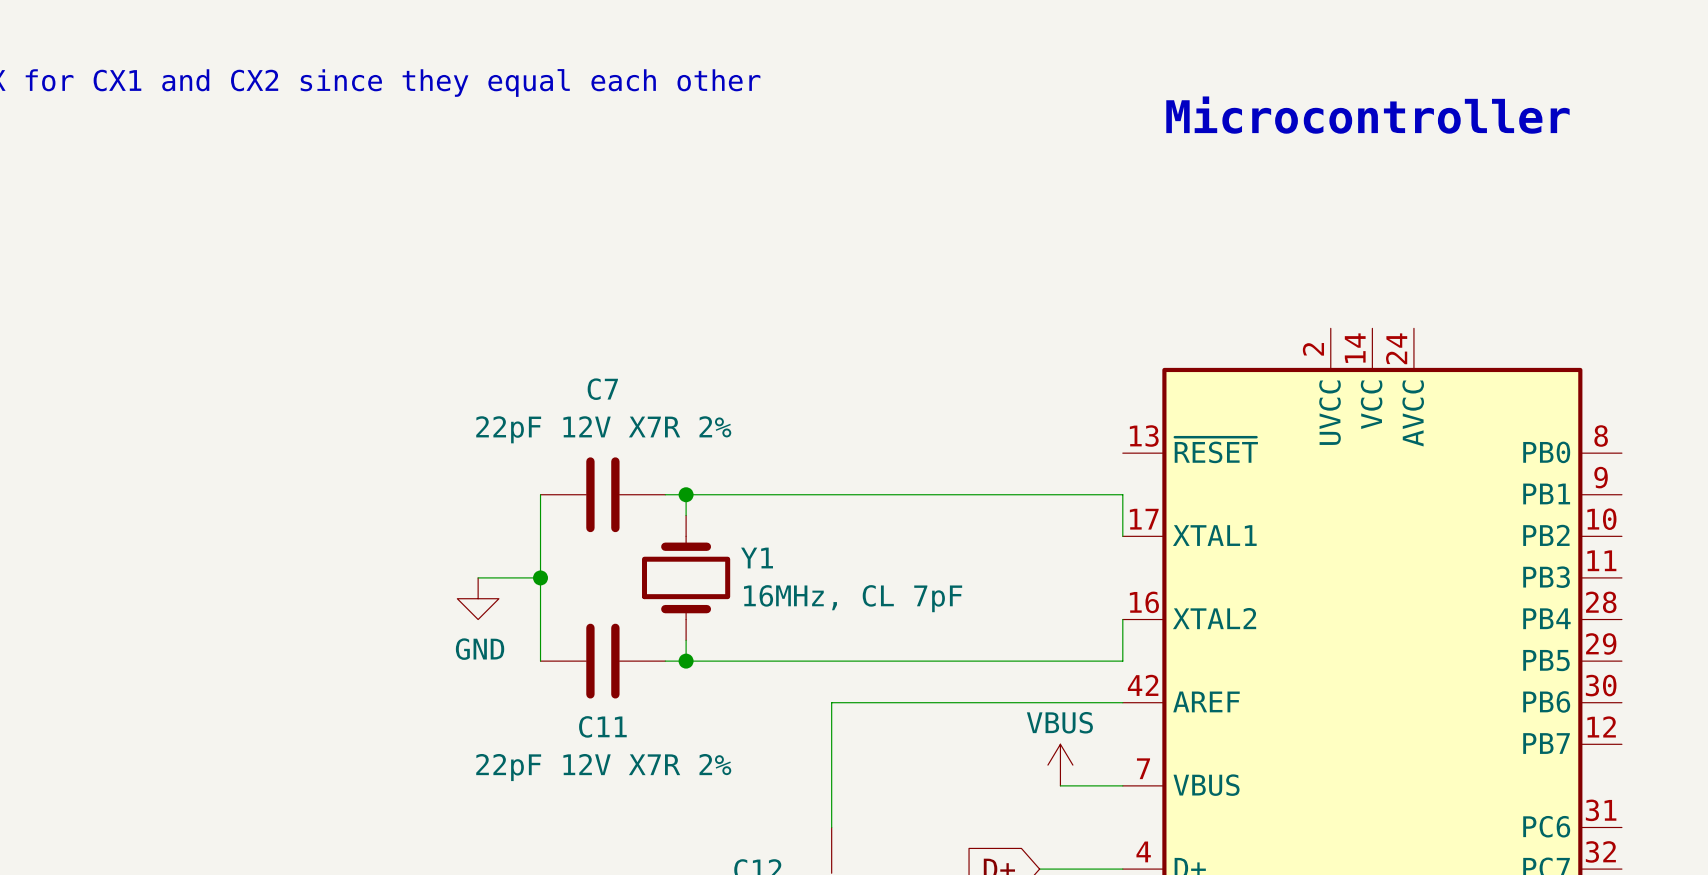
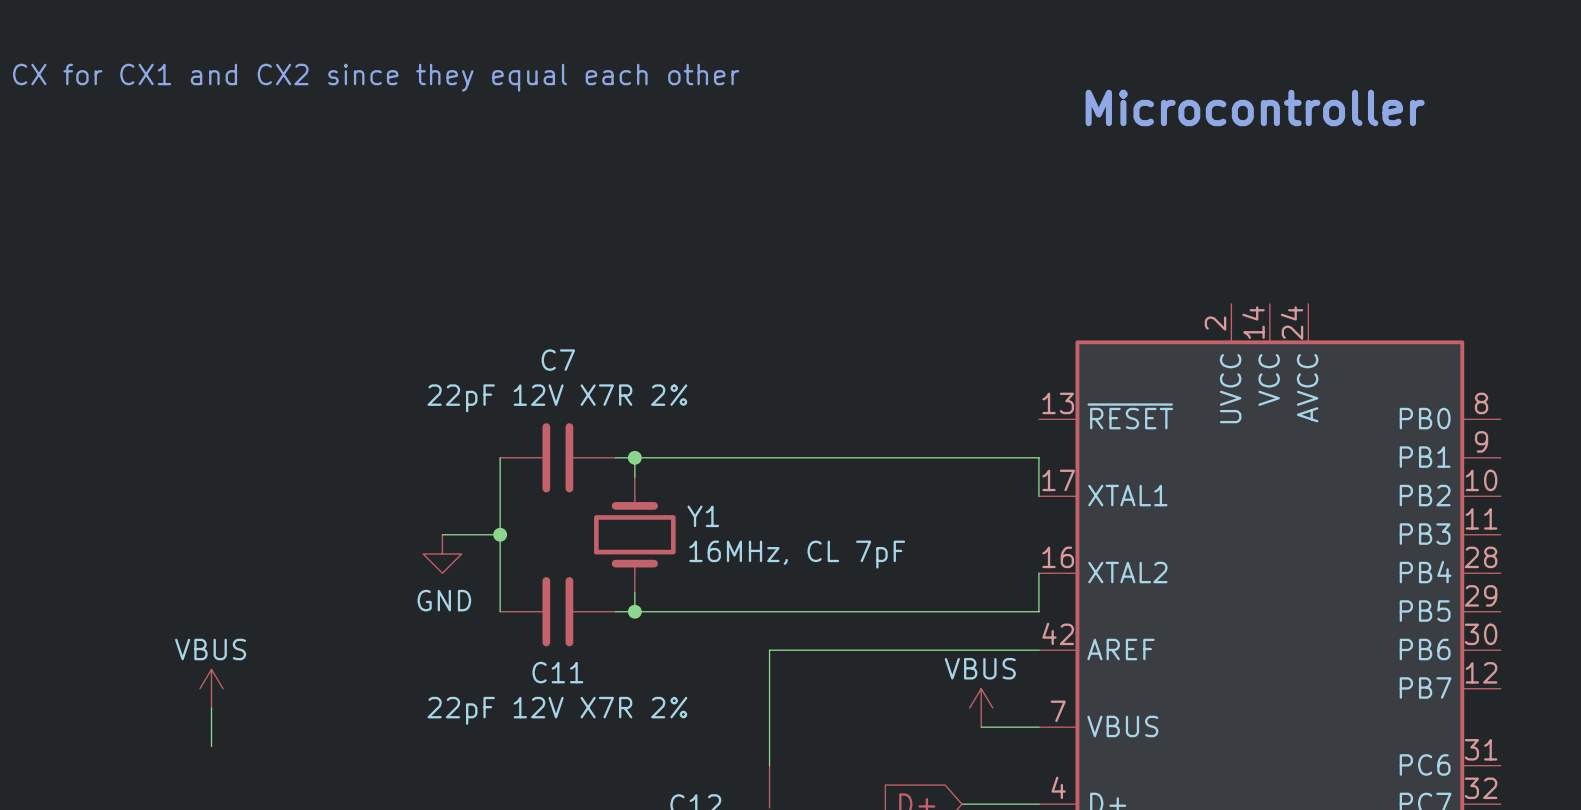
power symbol: none -> VBUS (211, 688)
wire: none -> (211, 707) (211, 746)

